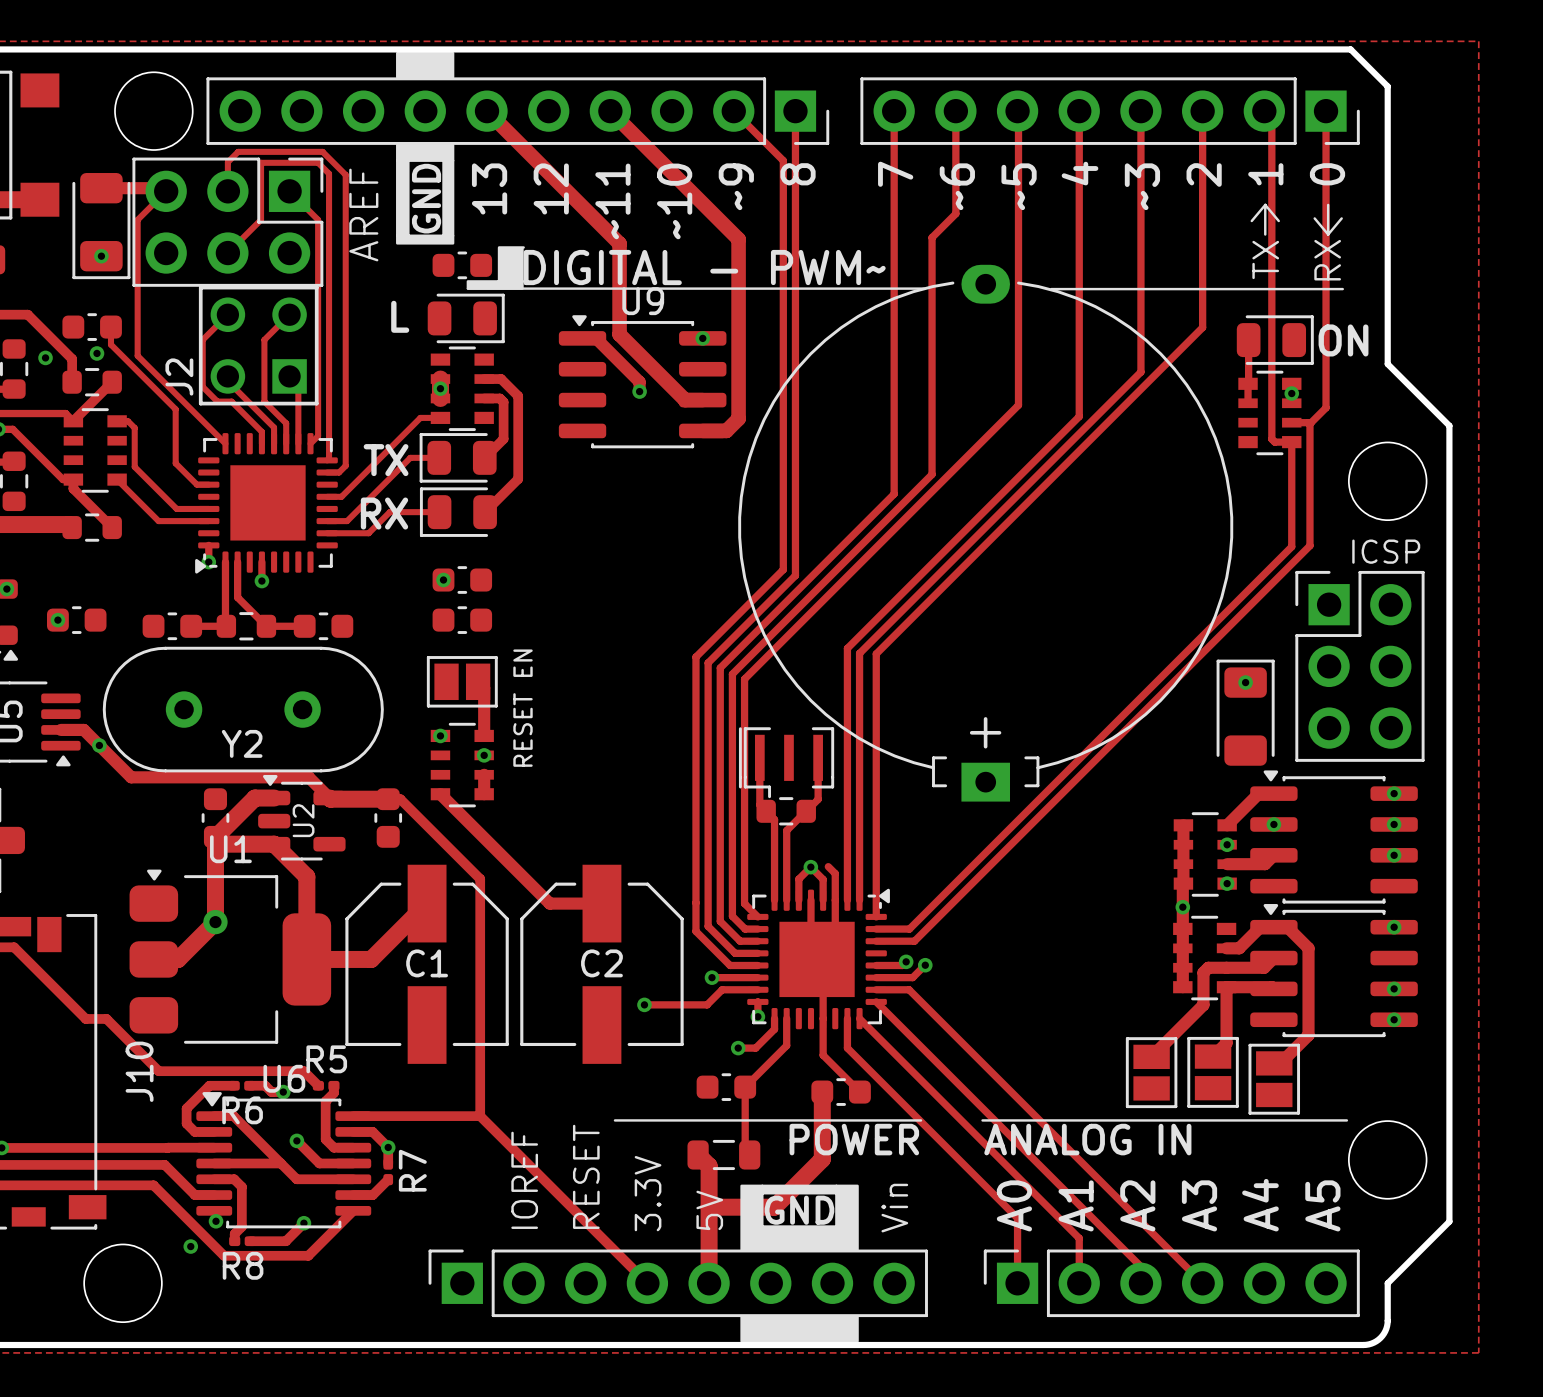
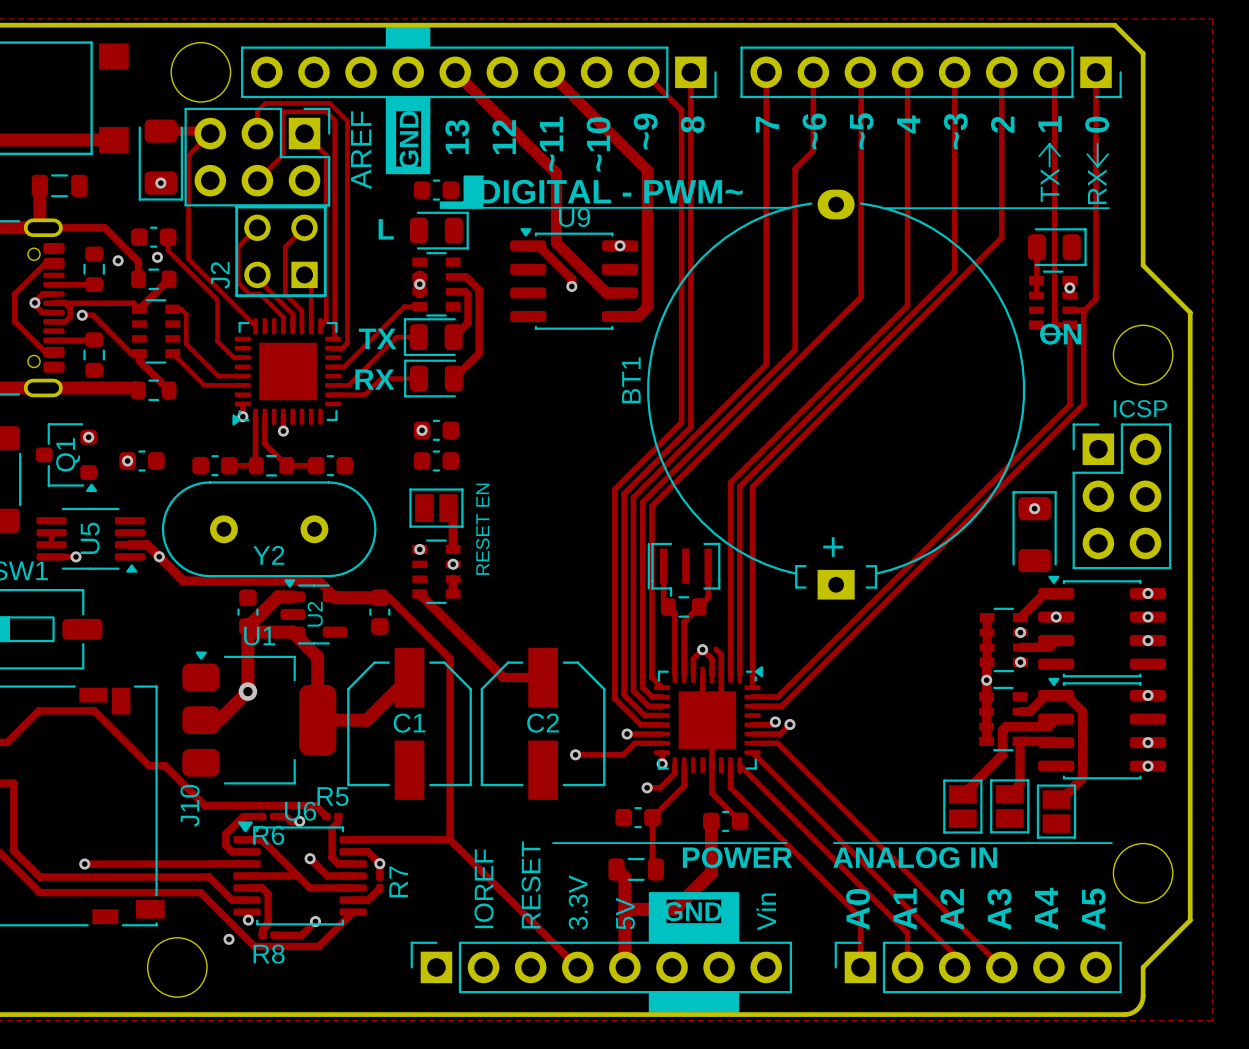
text position: ON (1343, 340) -> ON (1060, 334)
BT1 name: none -> BT1 (631, 380)

